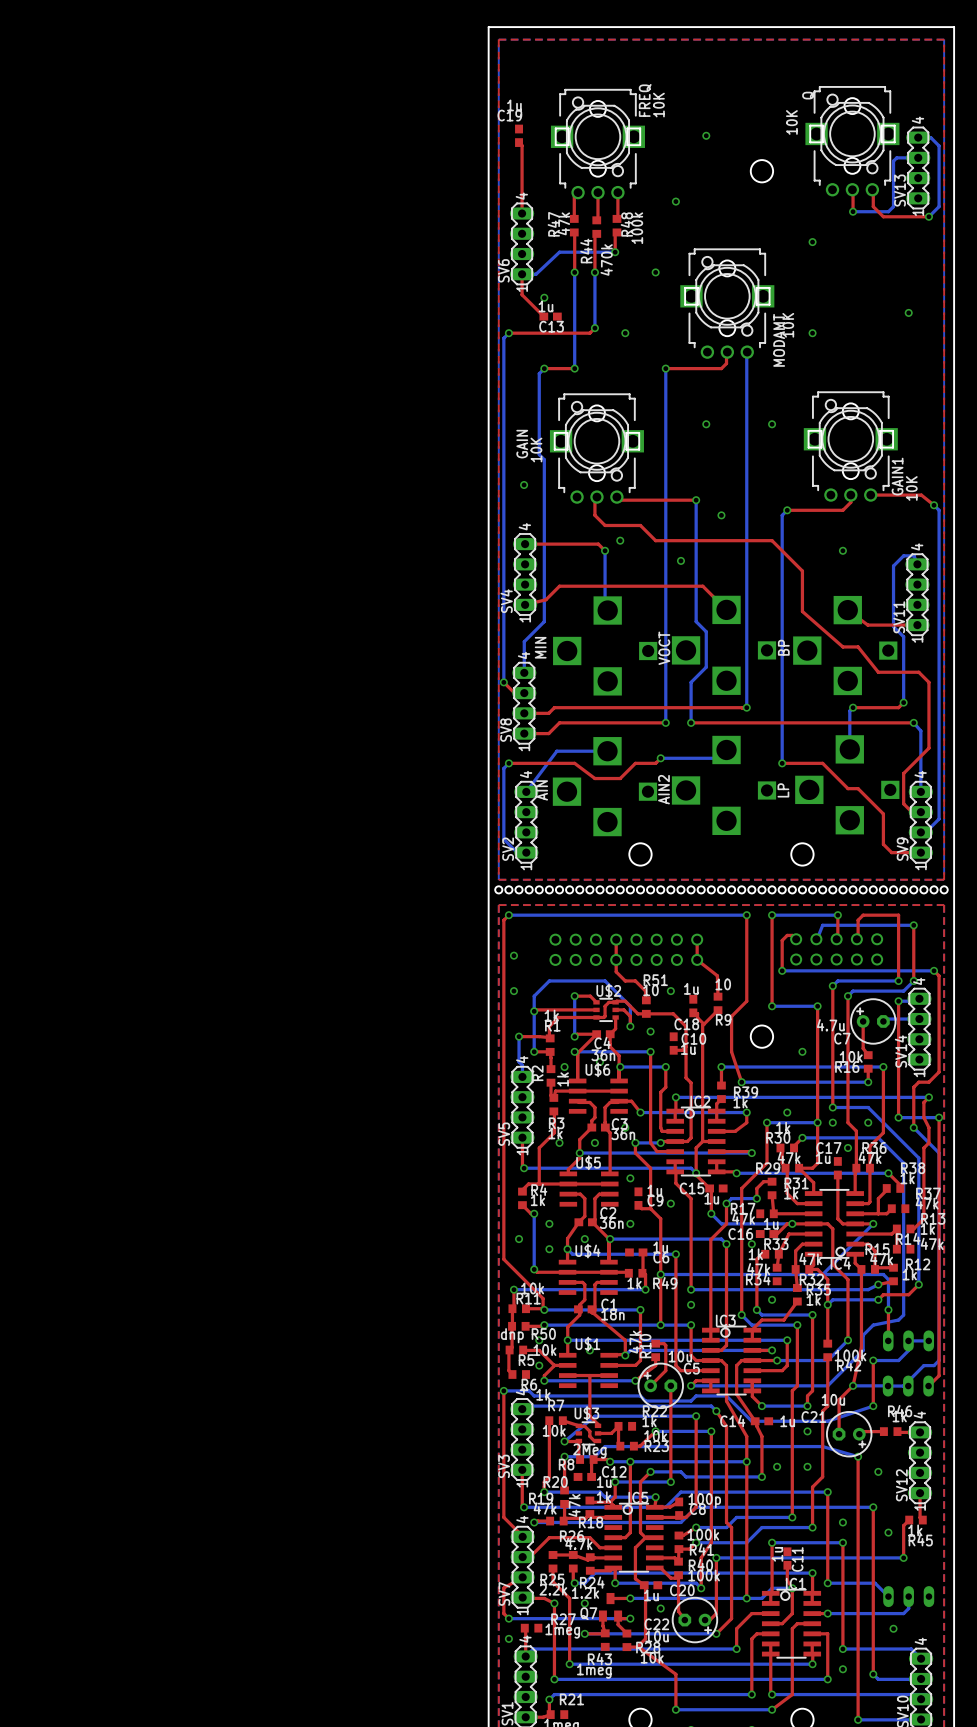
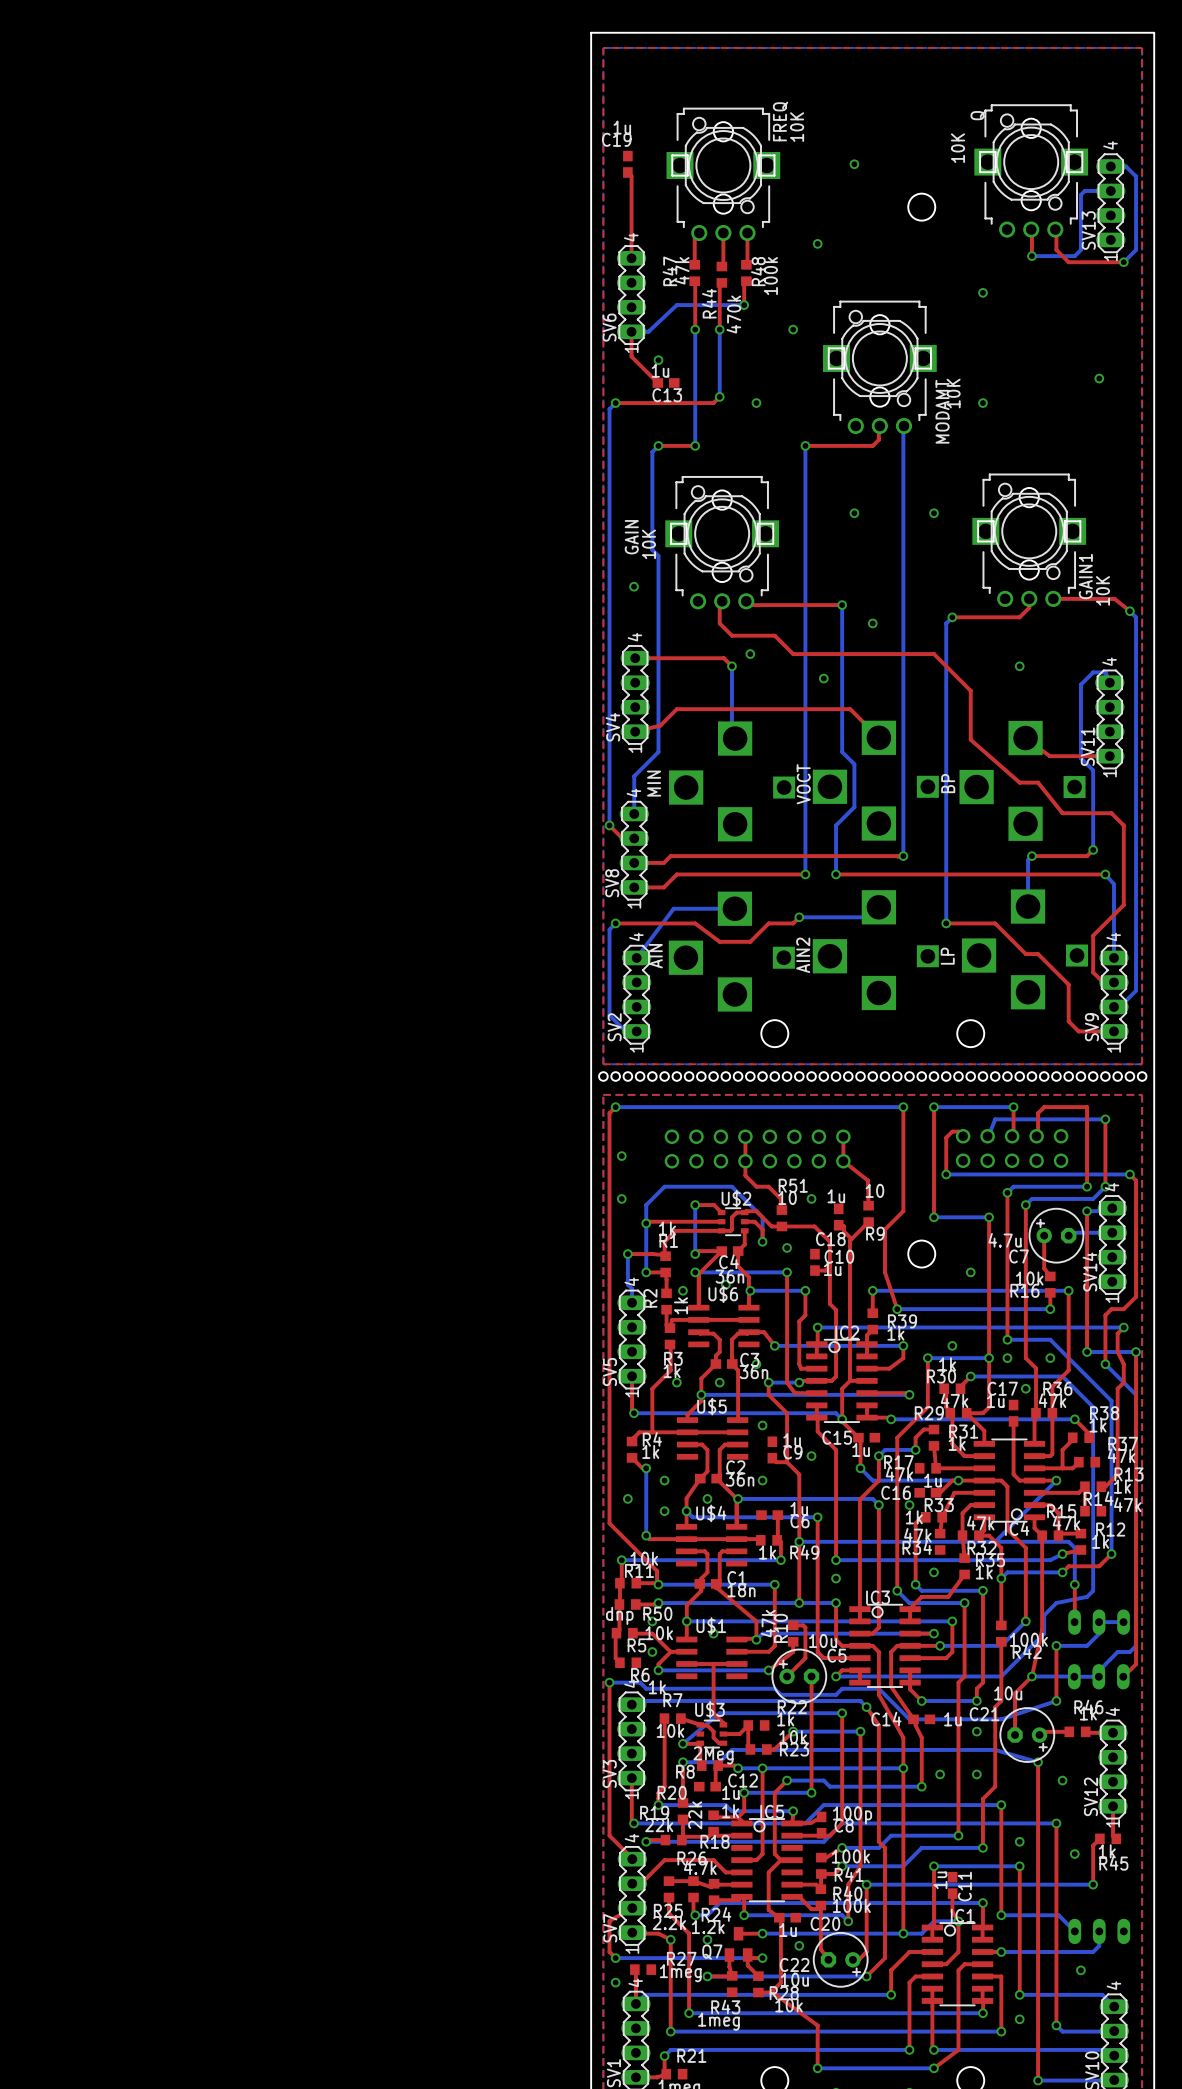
R20 value: 47k (574, 1505) -> 22k (695, 1815)
R19 value: 47k (545, 1508) -> 22k (659, 1825)

